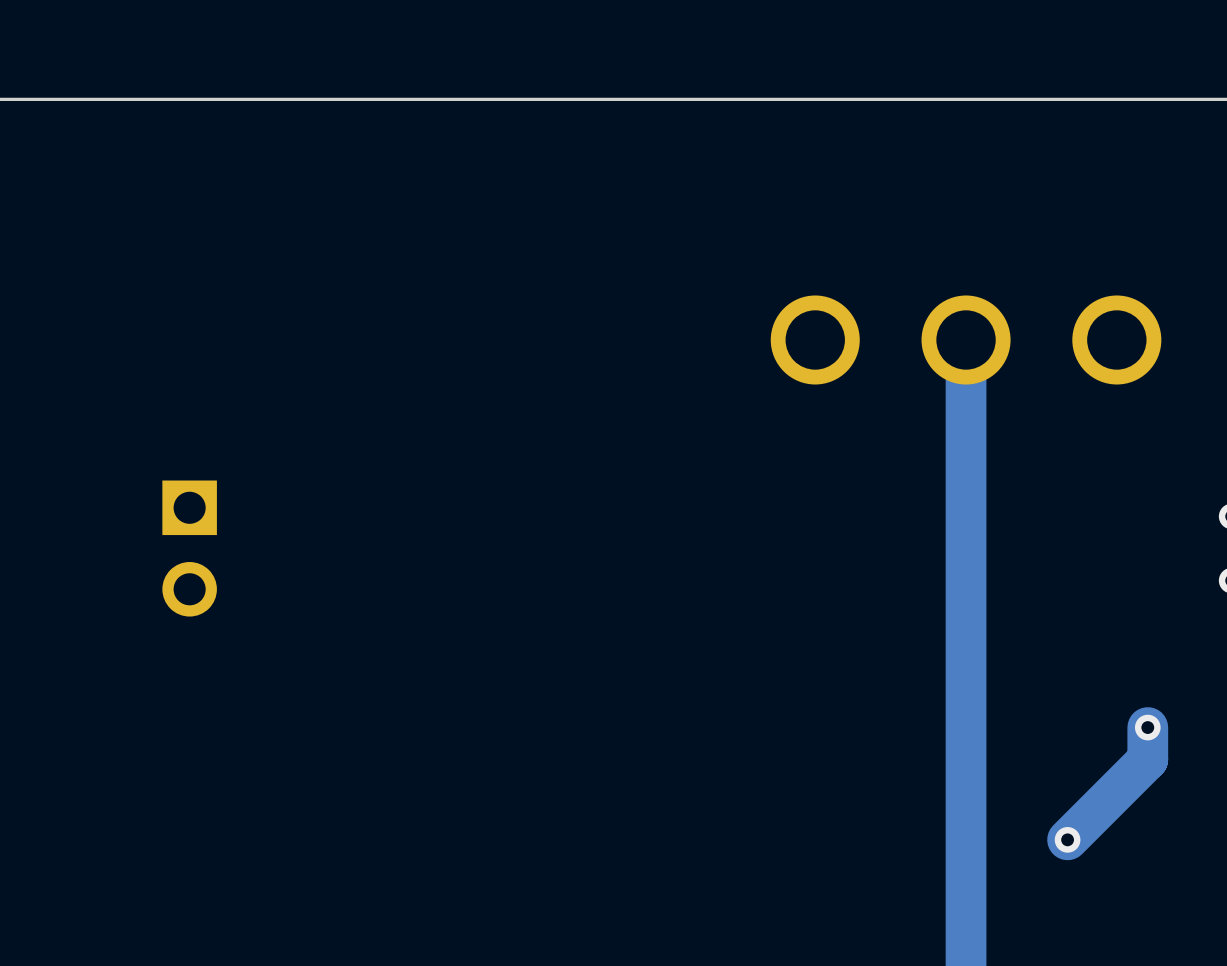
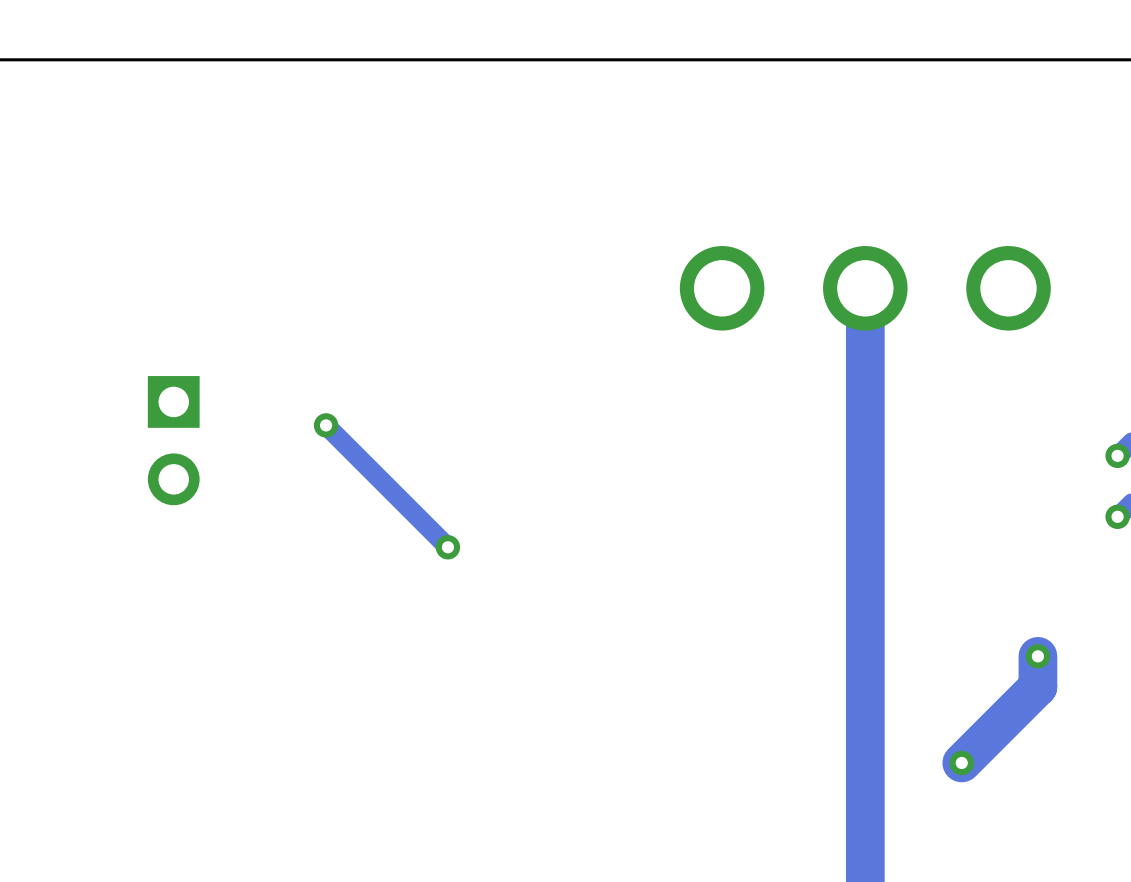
track: none -> (326, 425) (447, 547)
via: none -> (326, 425)
part position: (189, 548) -> (173, 440)
via: none -> (447, 547)

